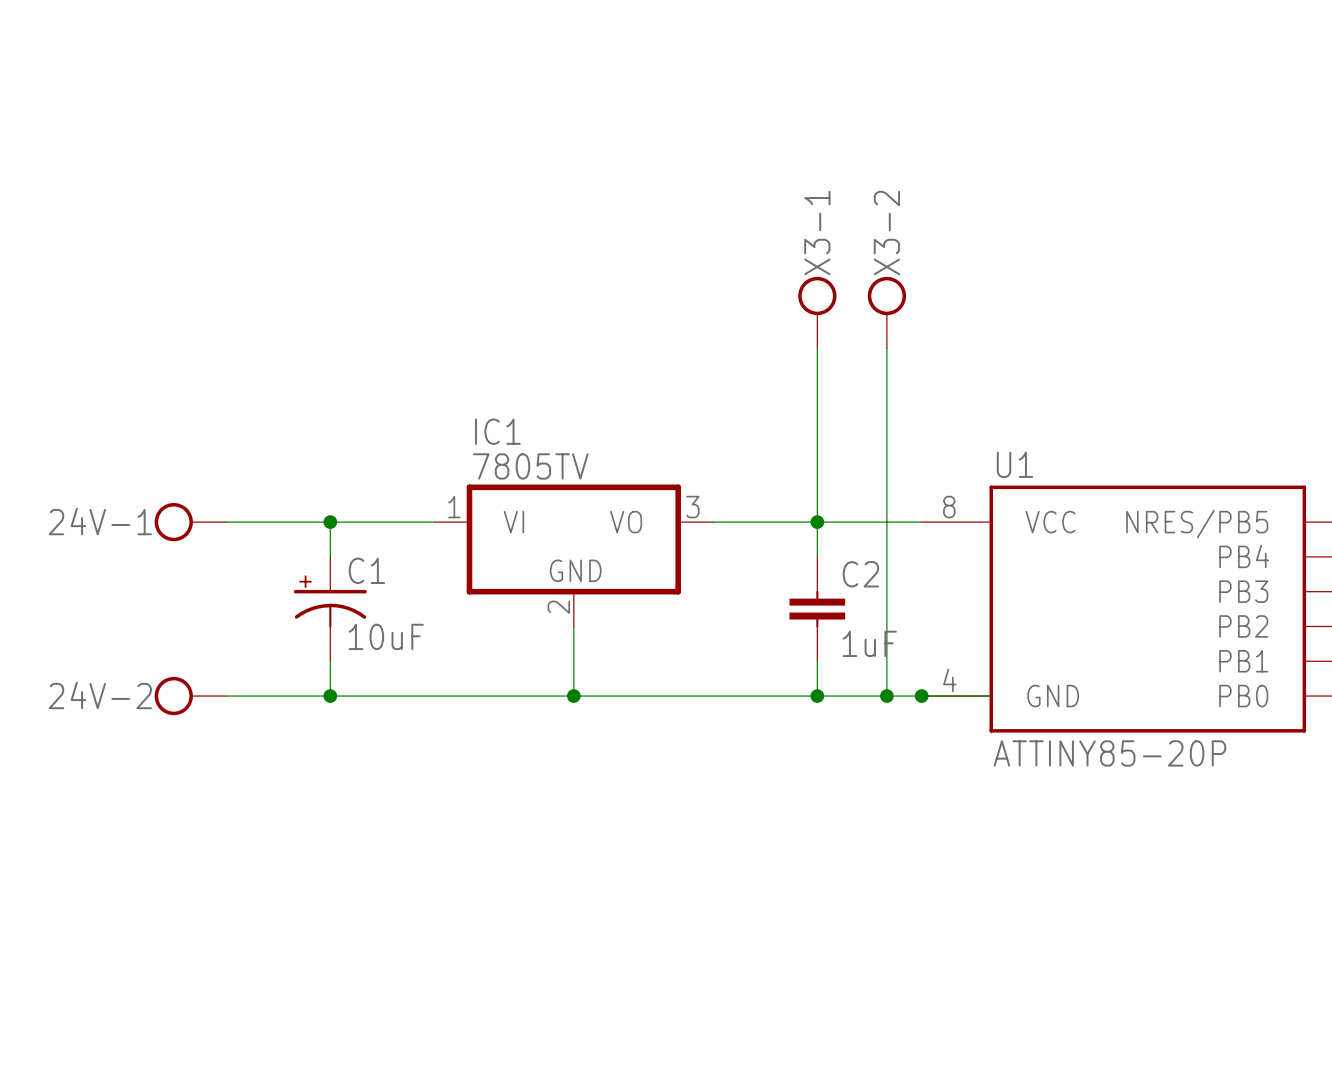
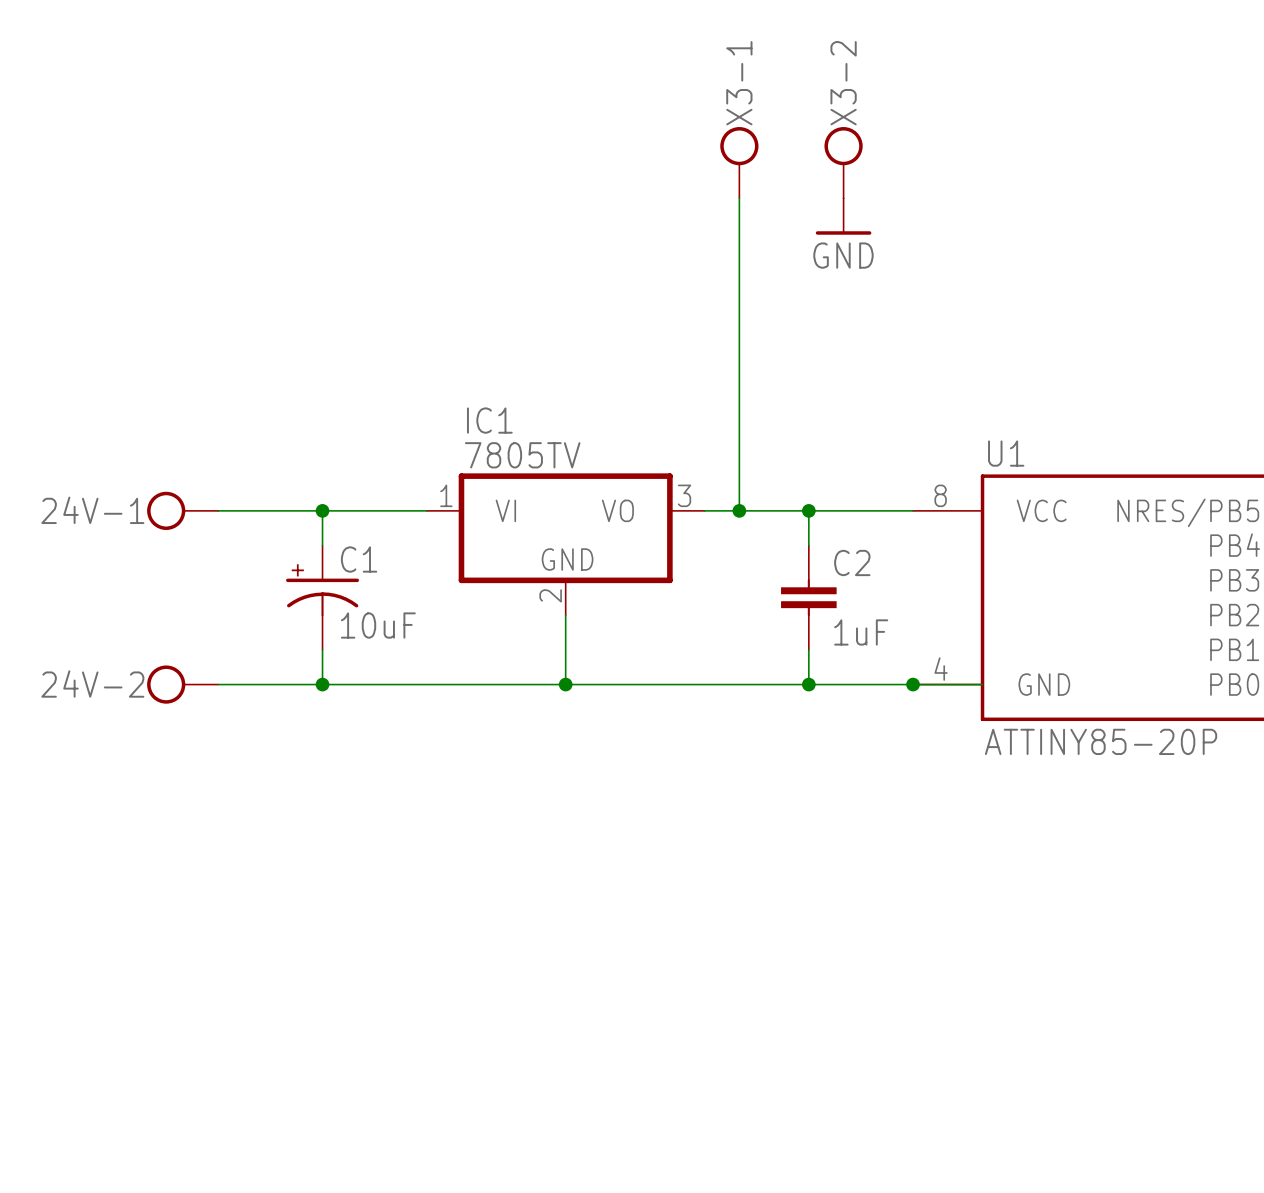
wire: none -> (739, 198) (739, 510)
power symbol: none -> GND (843, 216)
X3-1 position: (817, 312) -> (739, 162)
X3-2 position: (886, 312) -> (843, 162)
wire: (817, 348) (817, 522) -> none
wire: (886, 348) (886, 696) -> none
junction: none -> (739, 510)
junction: (886, 696) -> none

